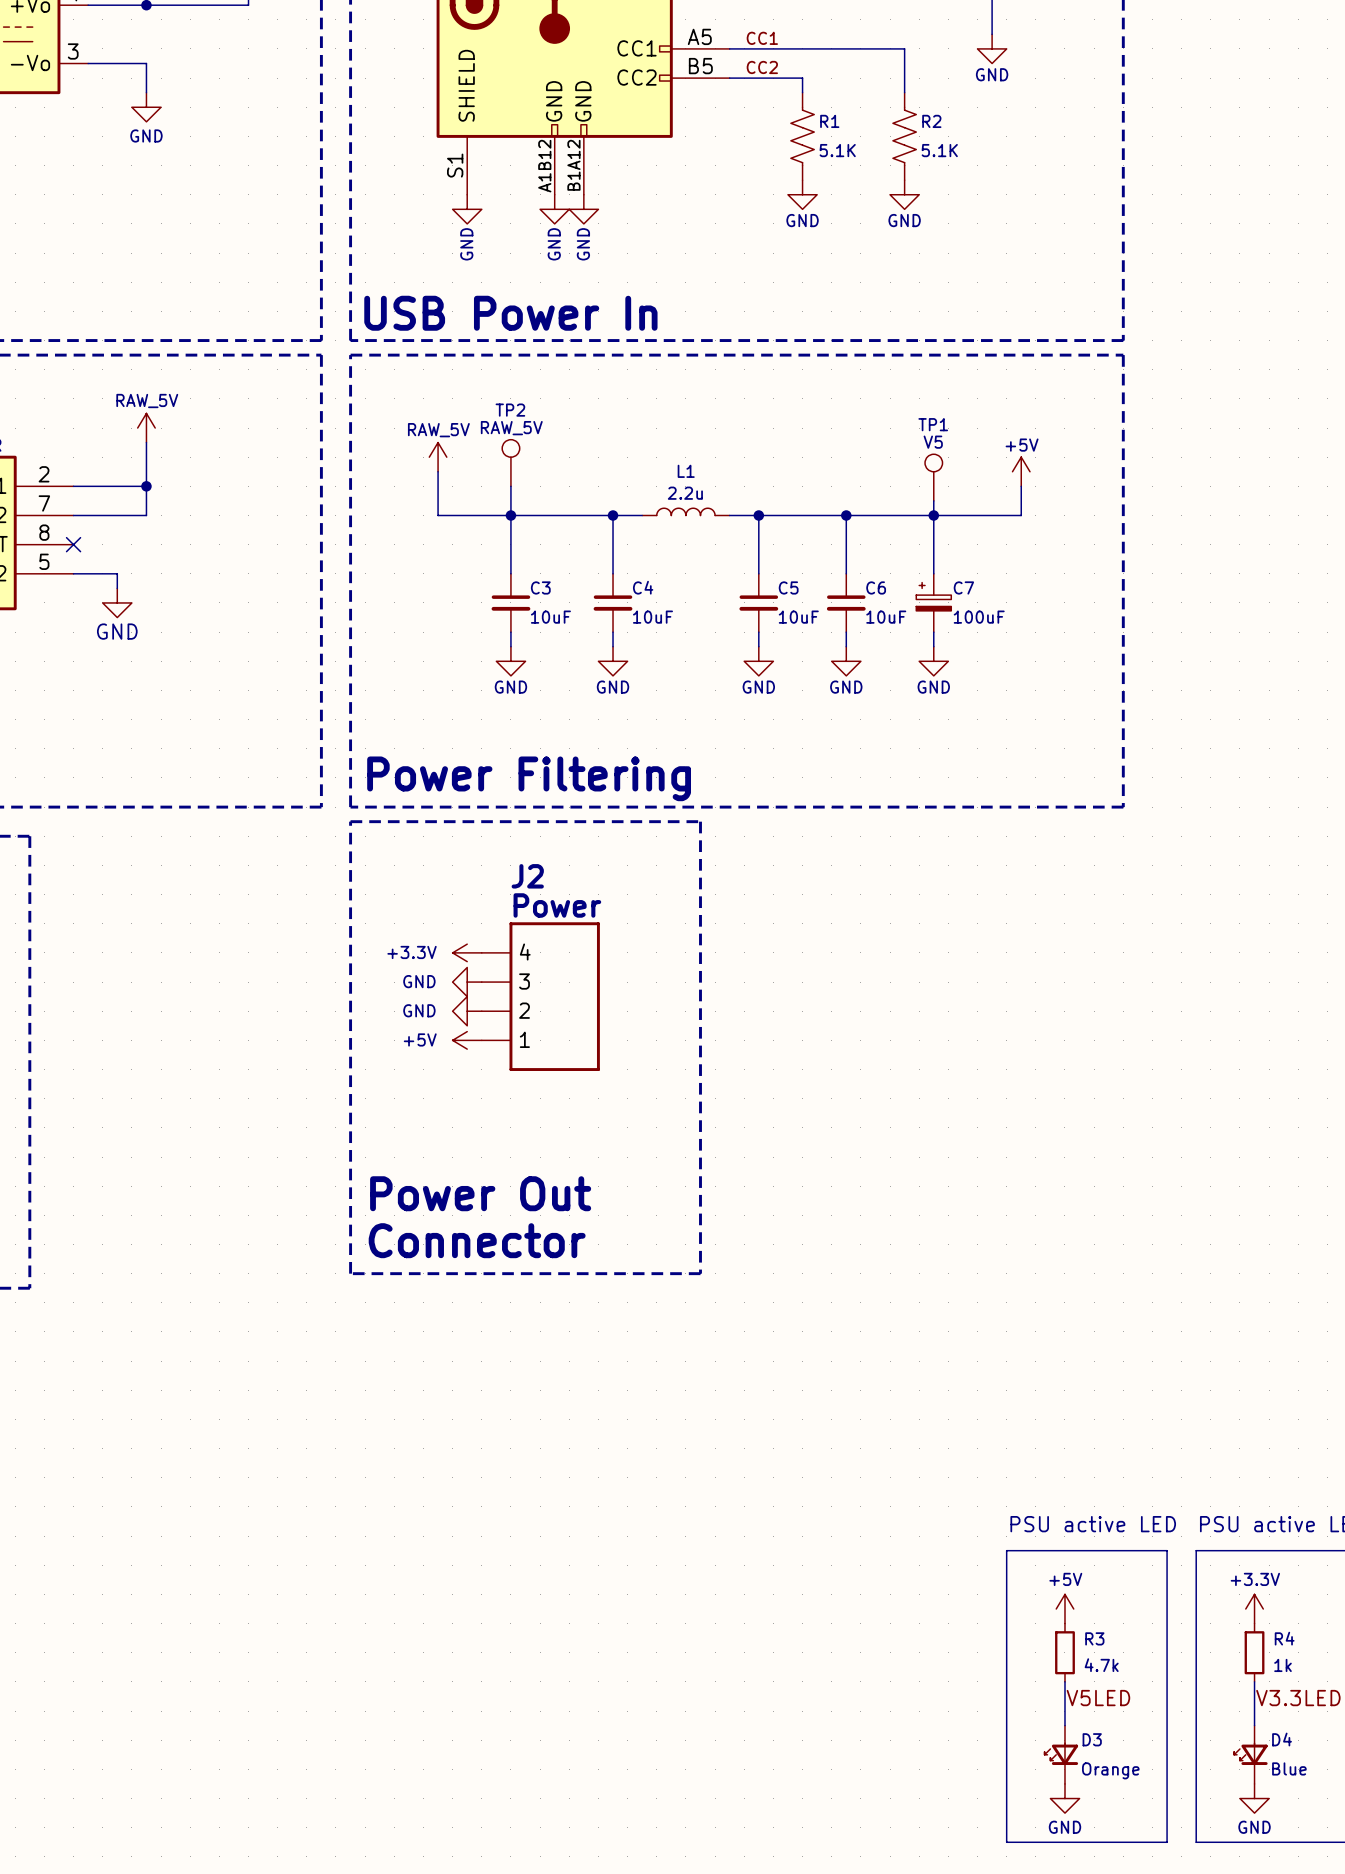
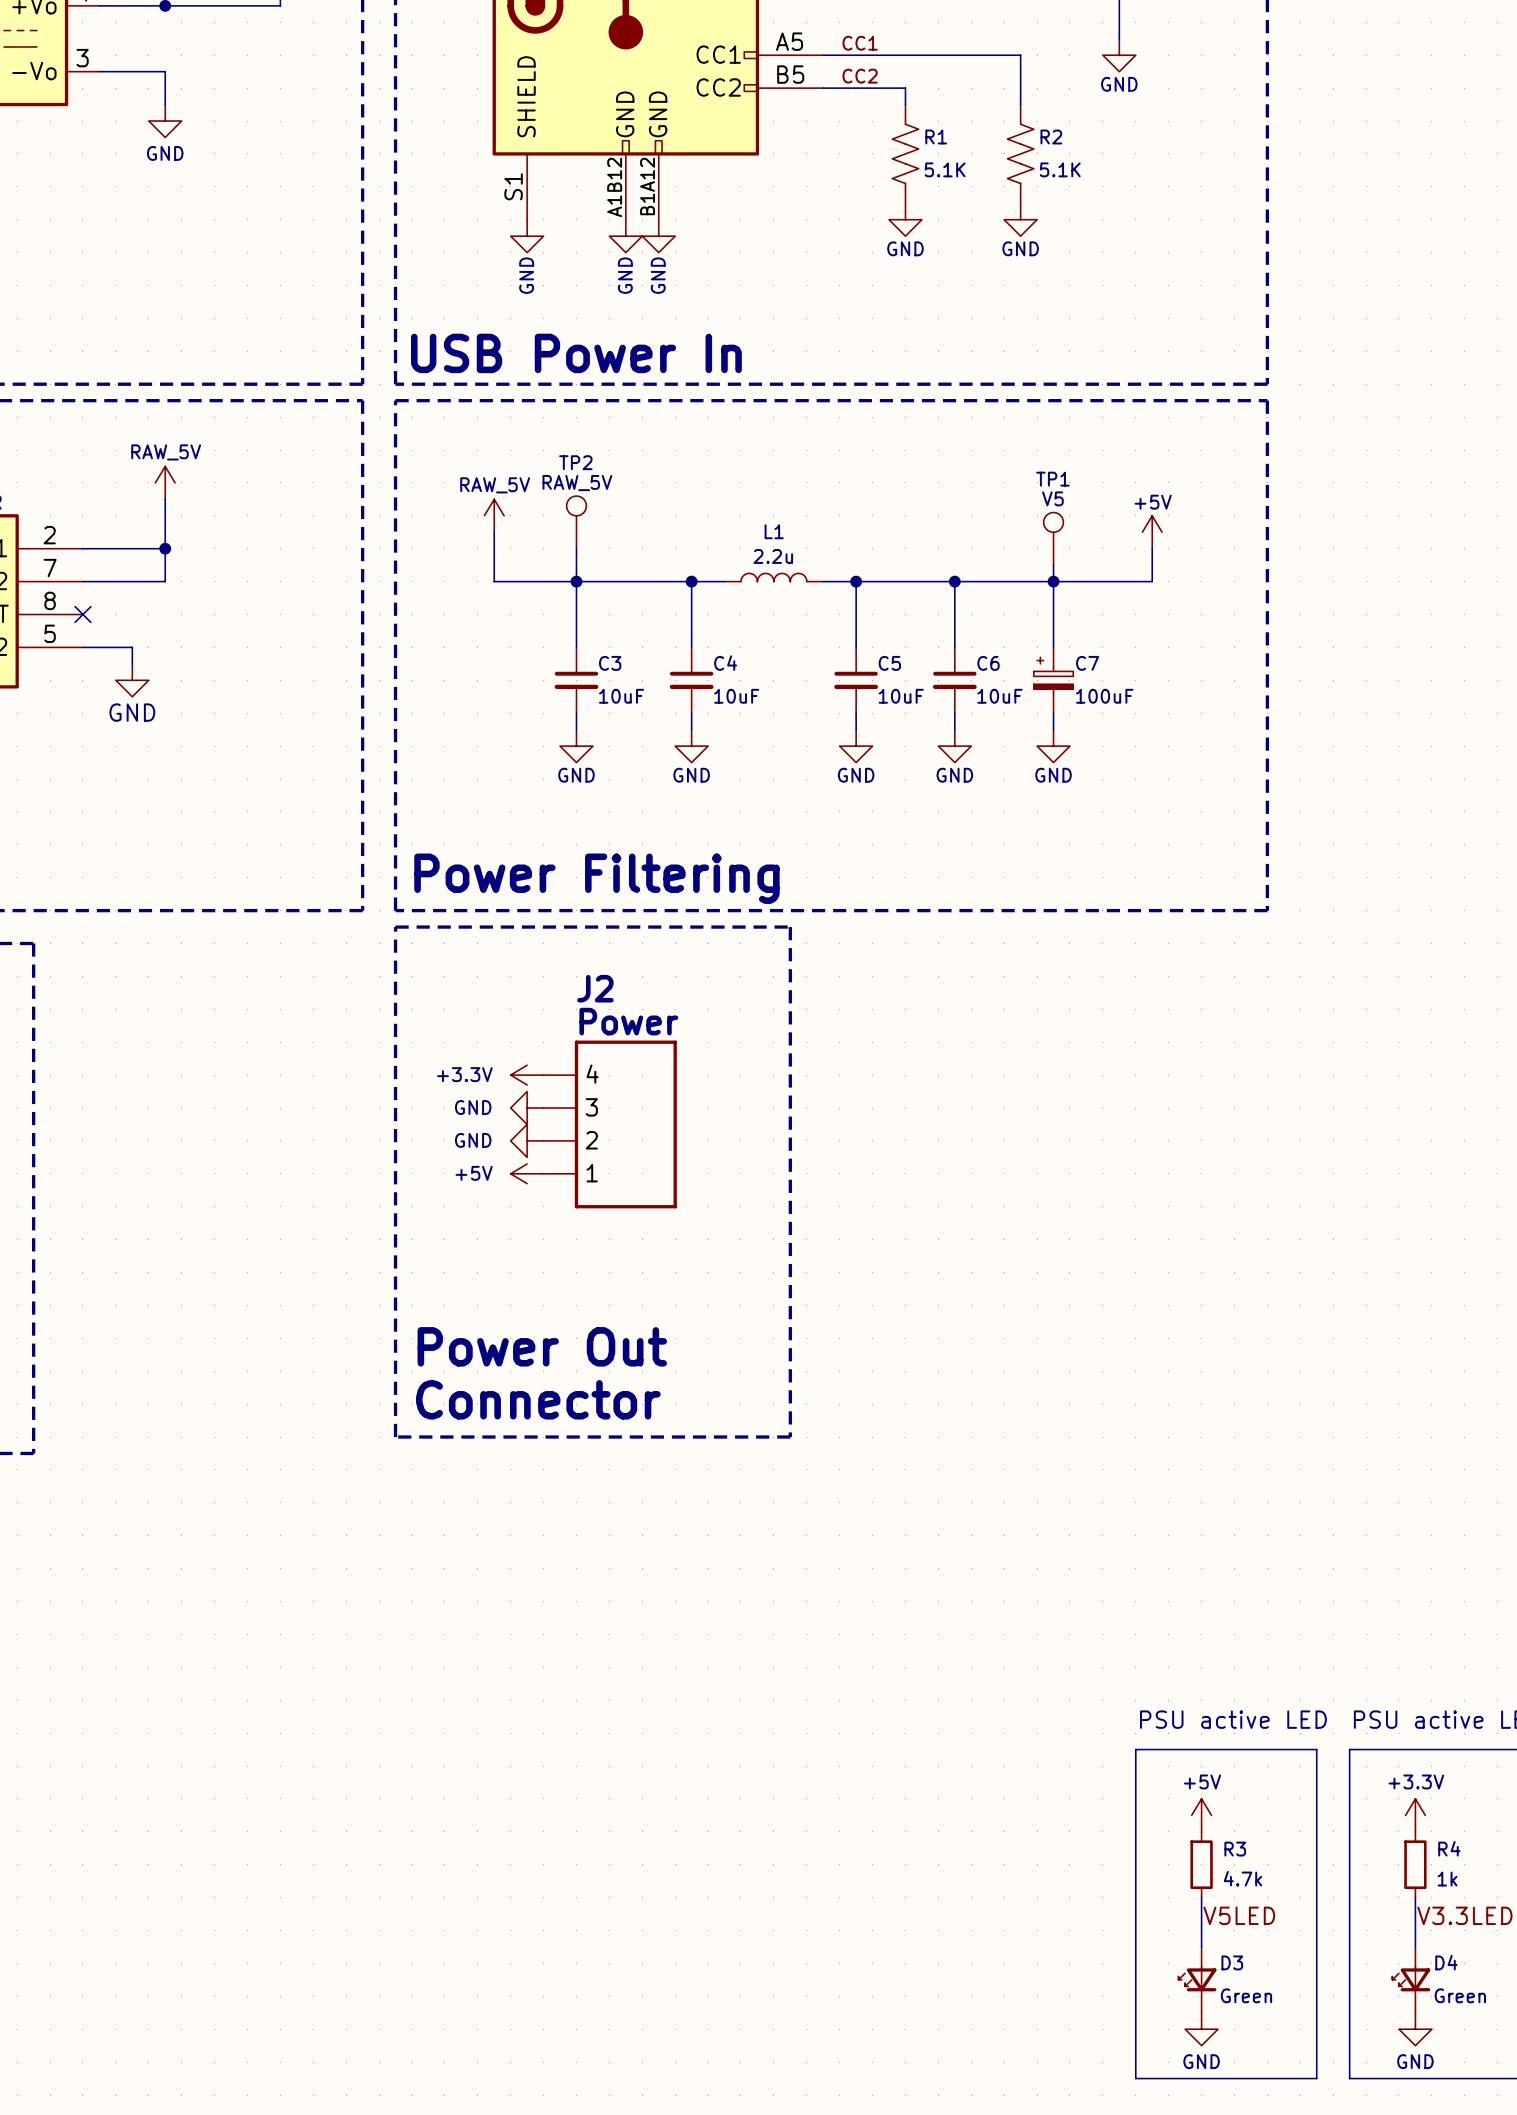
D4 value: Blue (1289, 1768) -> Green (1460, 1995)
D3 value: Orange (1110, 1770) -> Green (1246, 1995)

